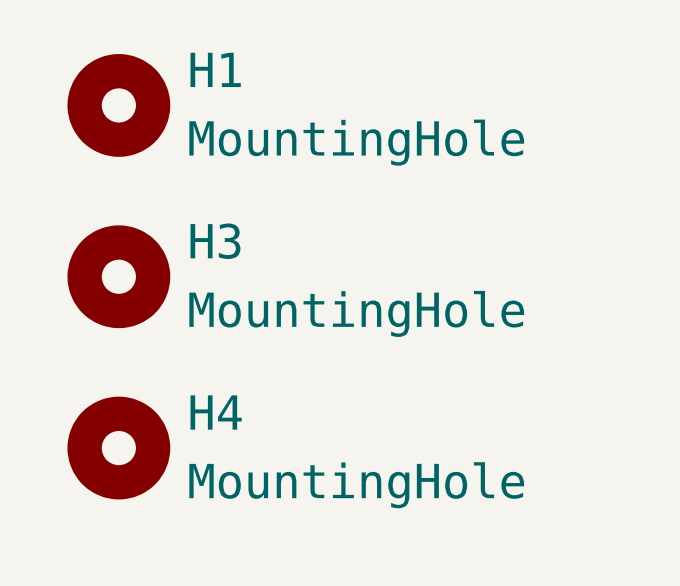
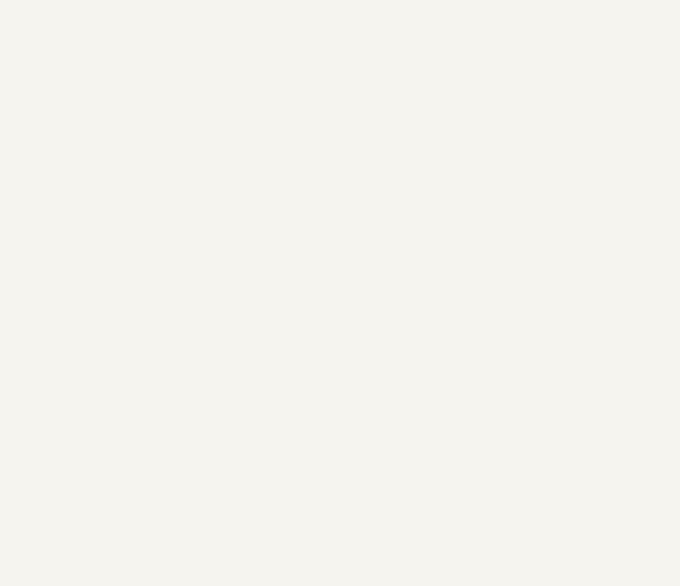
H1: MountingHole (118, 105) -> none
H3: MountingHole (118, 276) -> none
H4: MountingHole (118, 448) -> none

